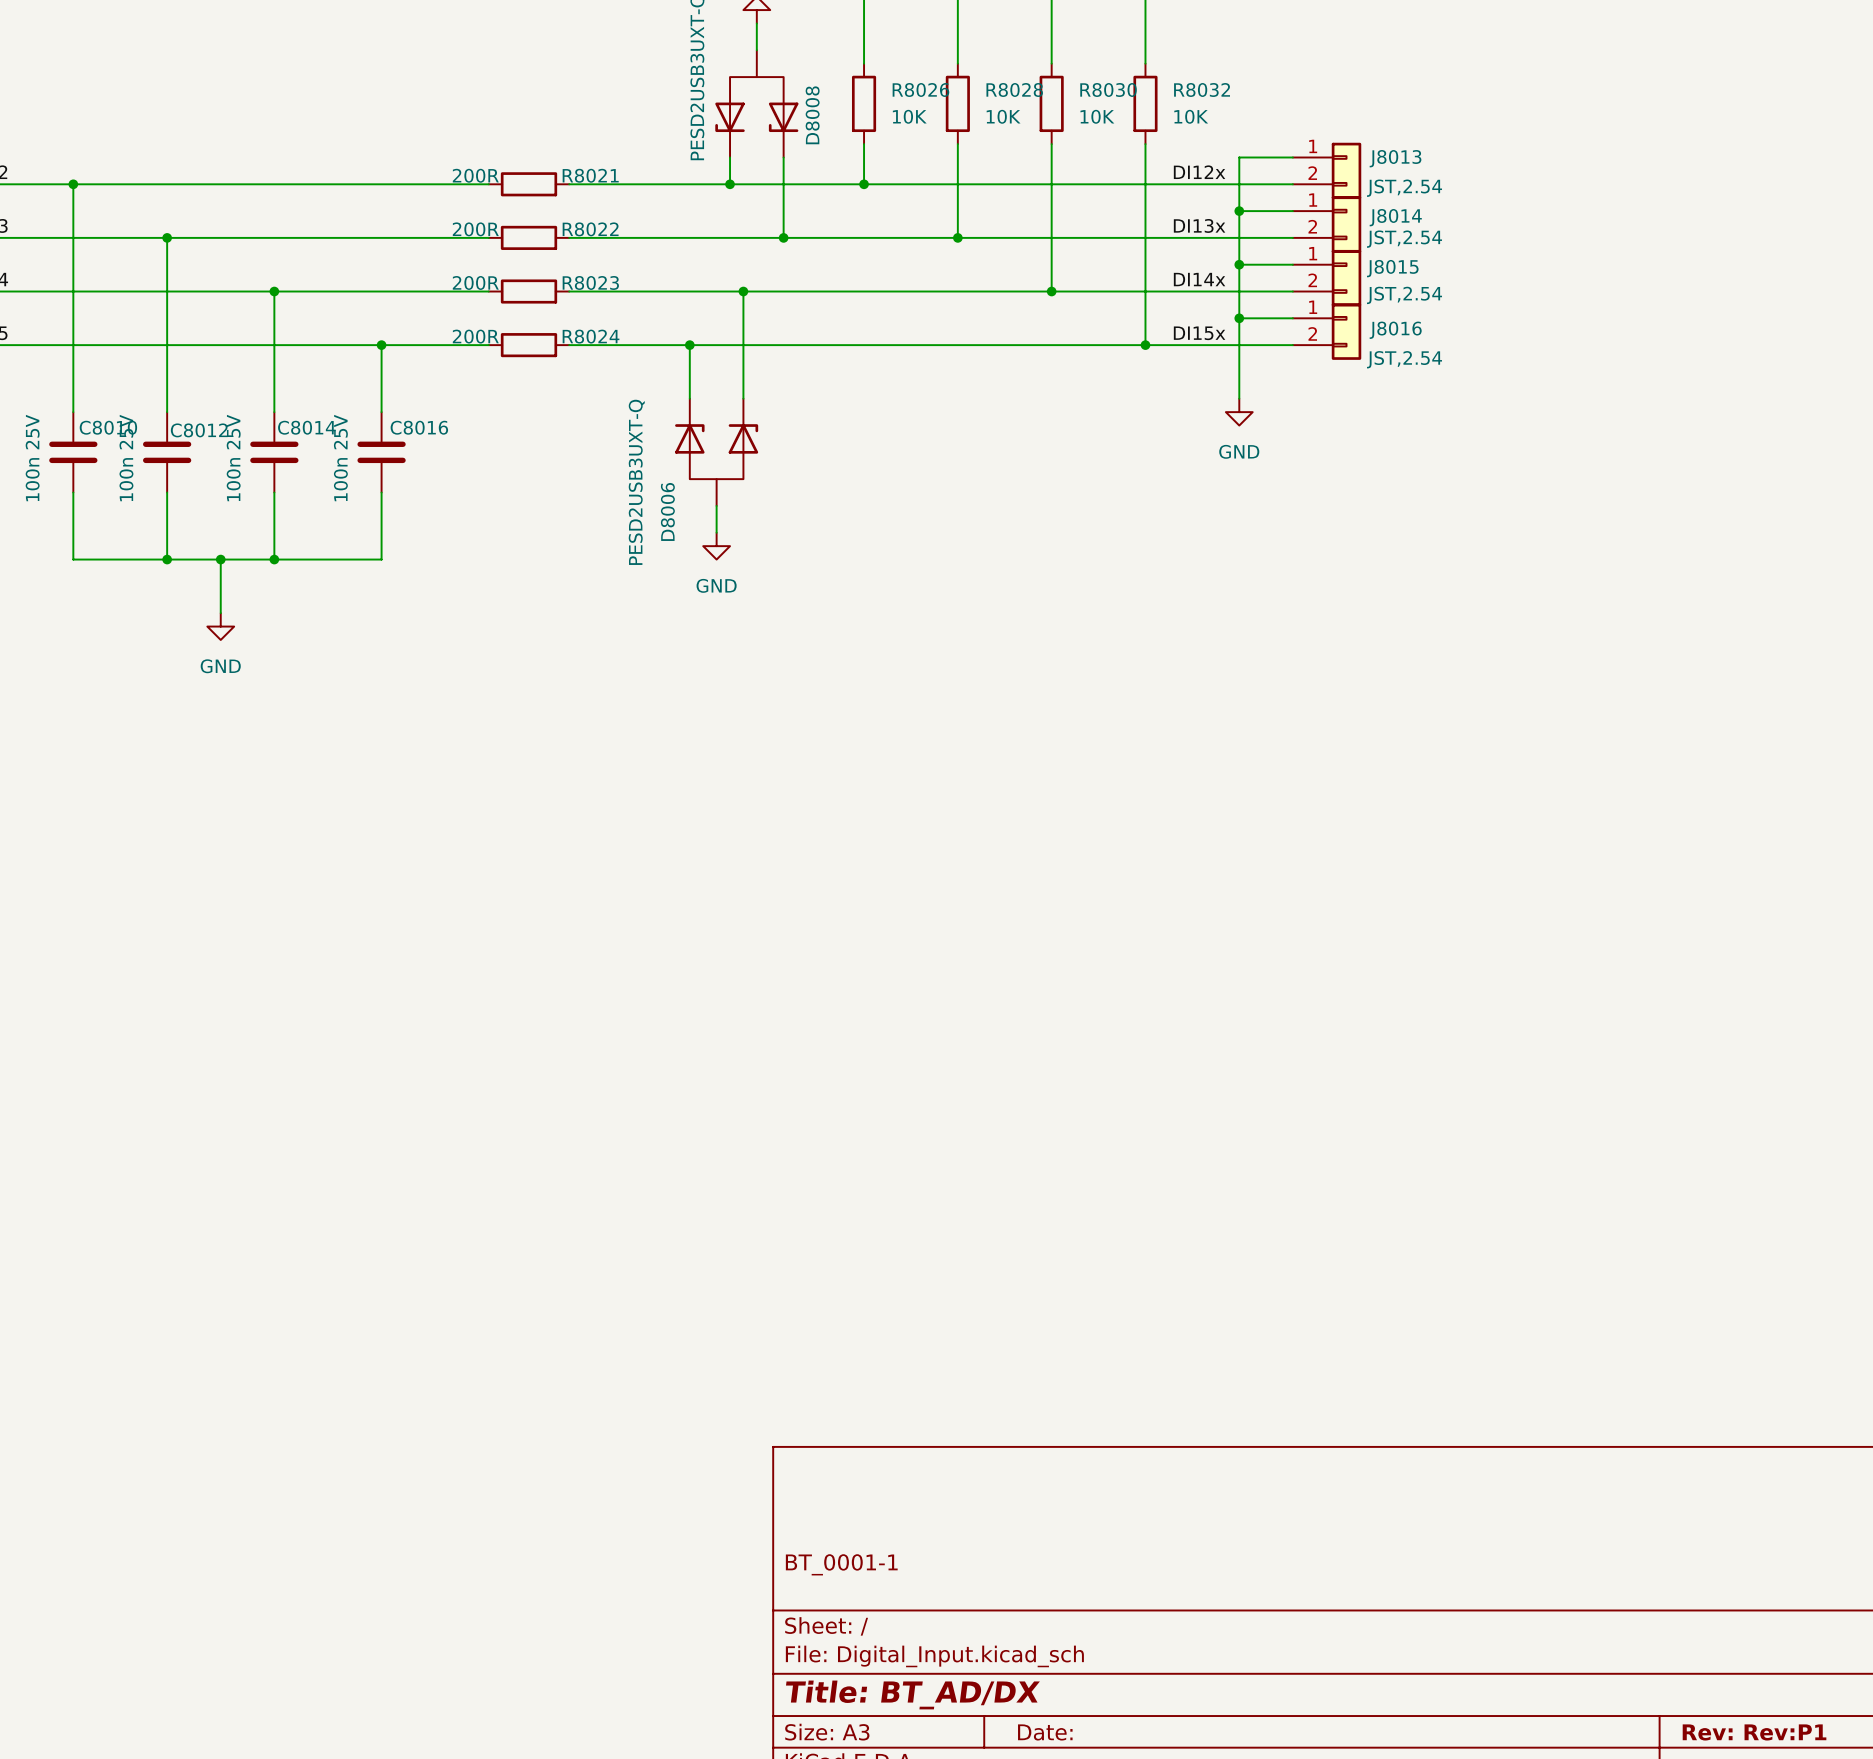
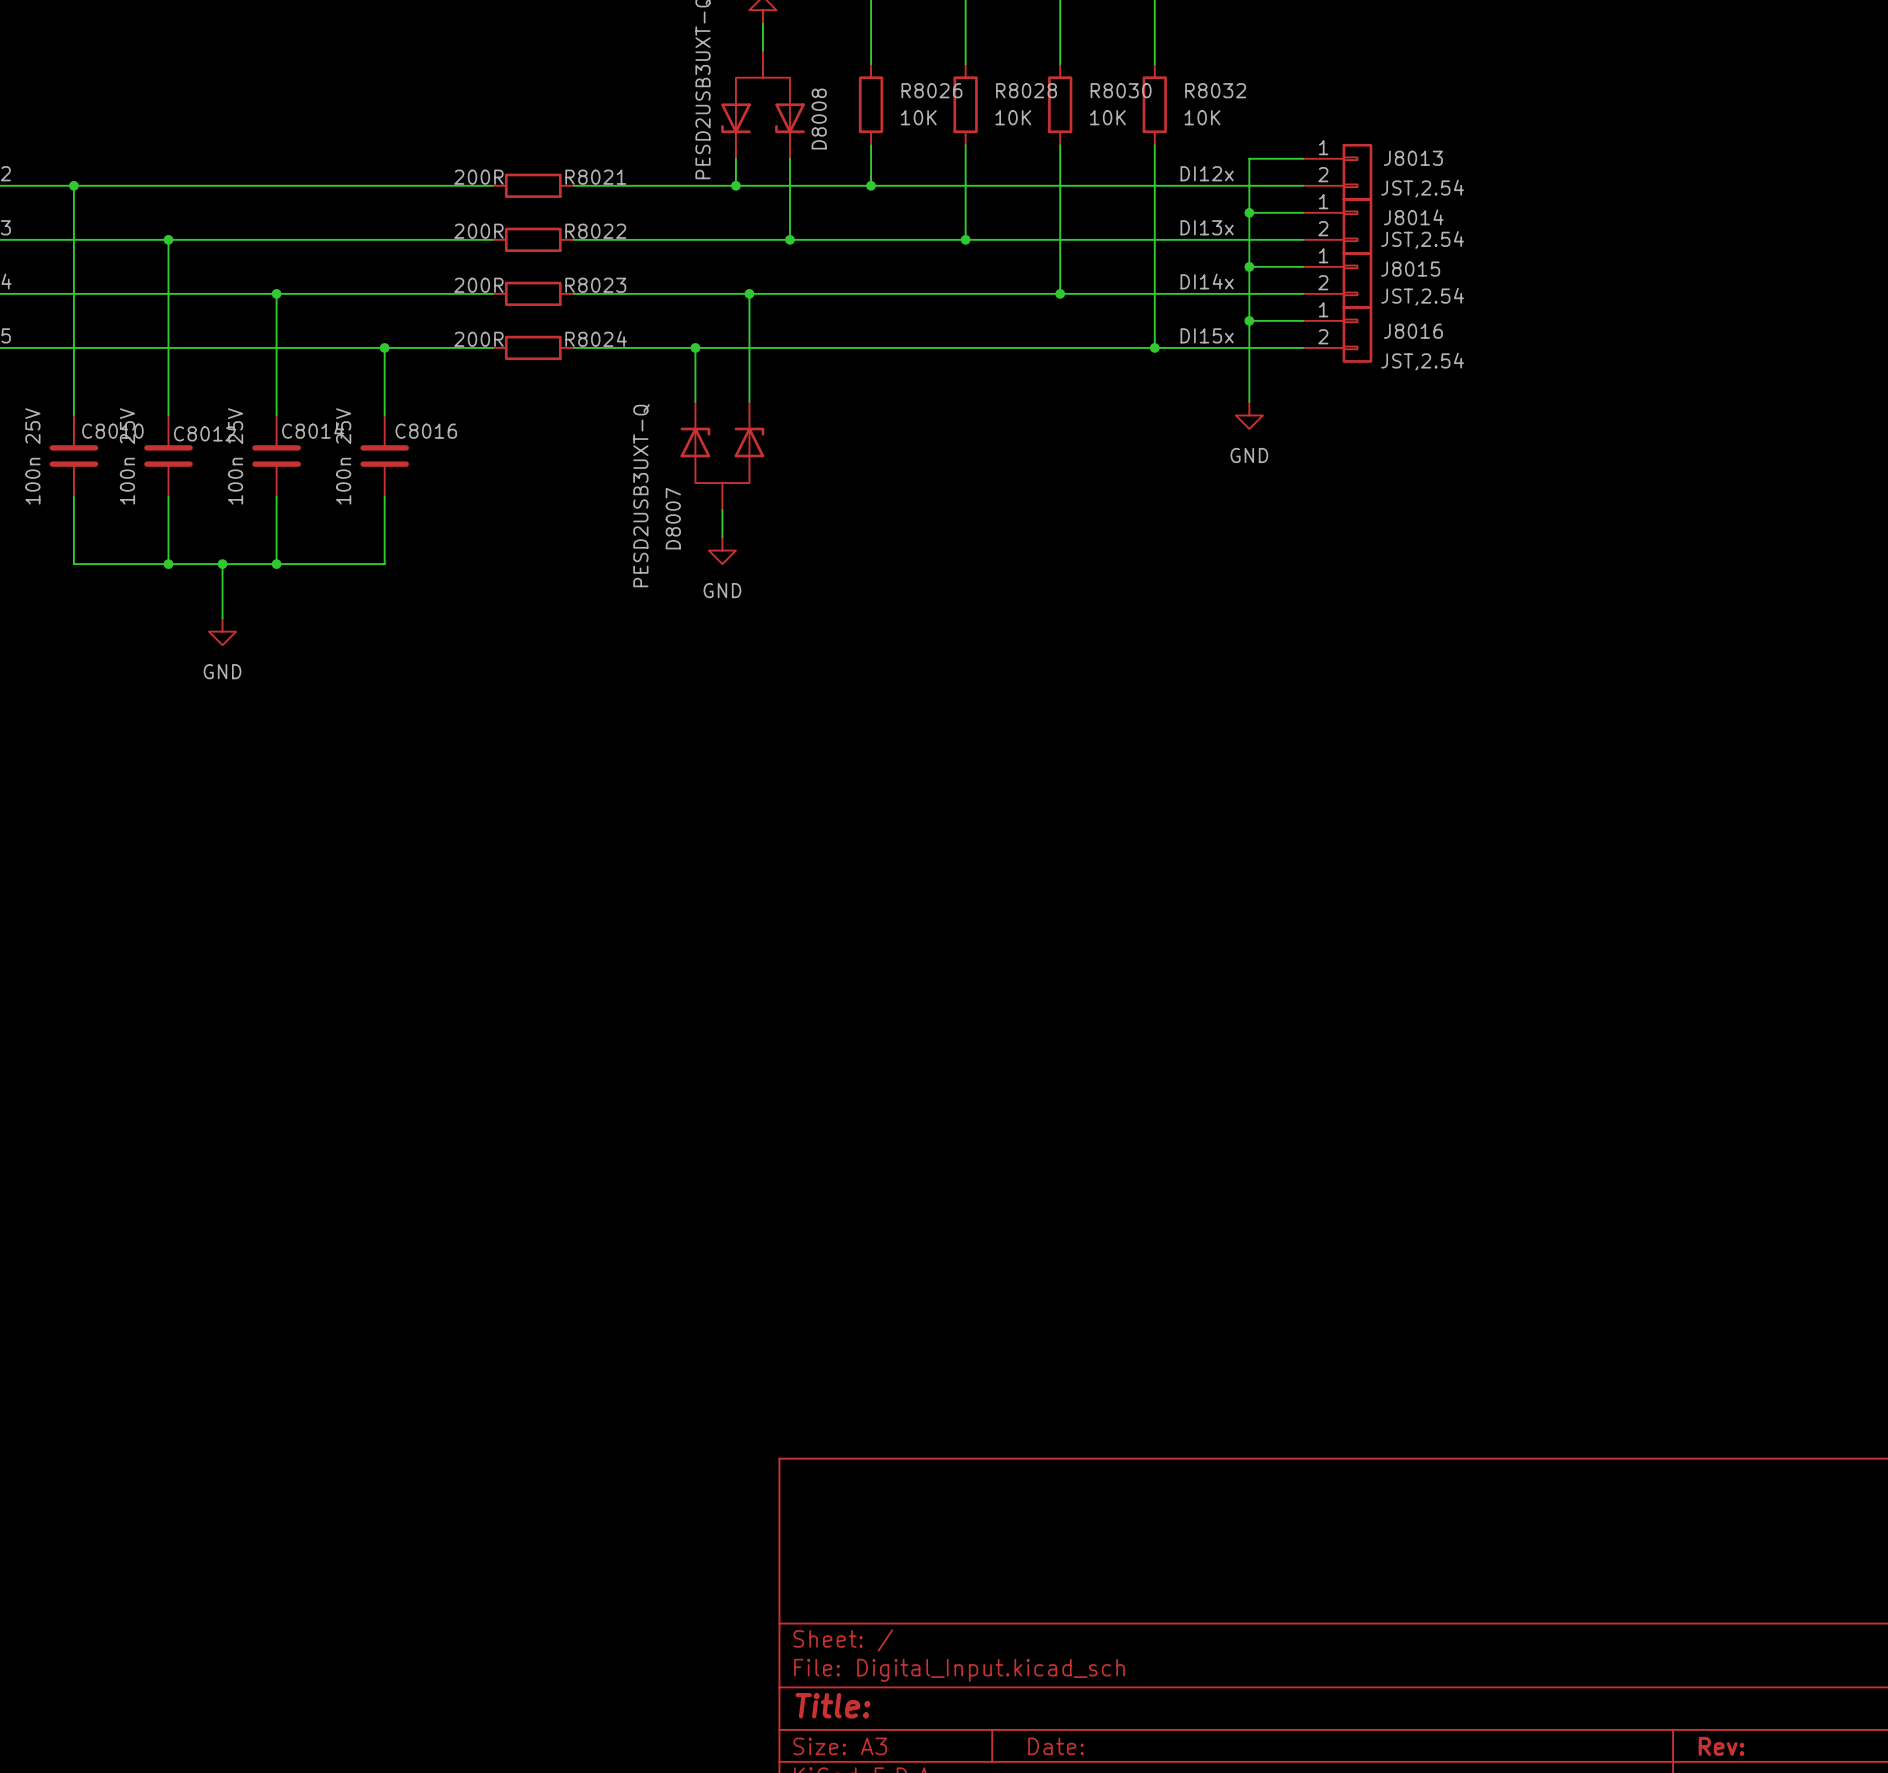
D8006 name: D8006 (667, 511) -> D8007 (673, 518)
title block: BT_0001-1 (841, 1564) -> none
title block: Title: BT_AD/DX (912, 1694) -> Title: (832, 1705)
title block: Rev: Rev:P1 (1754, 1732) -> Rev: (1721, 1746)

